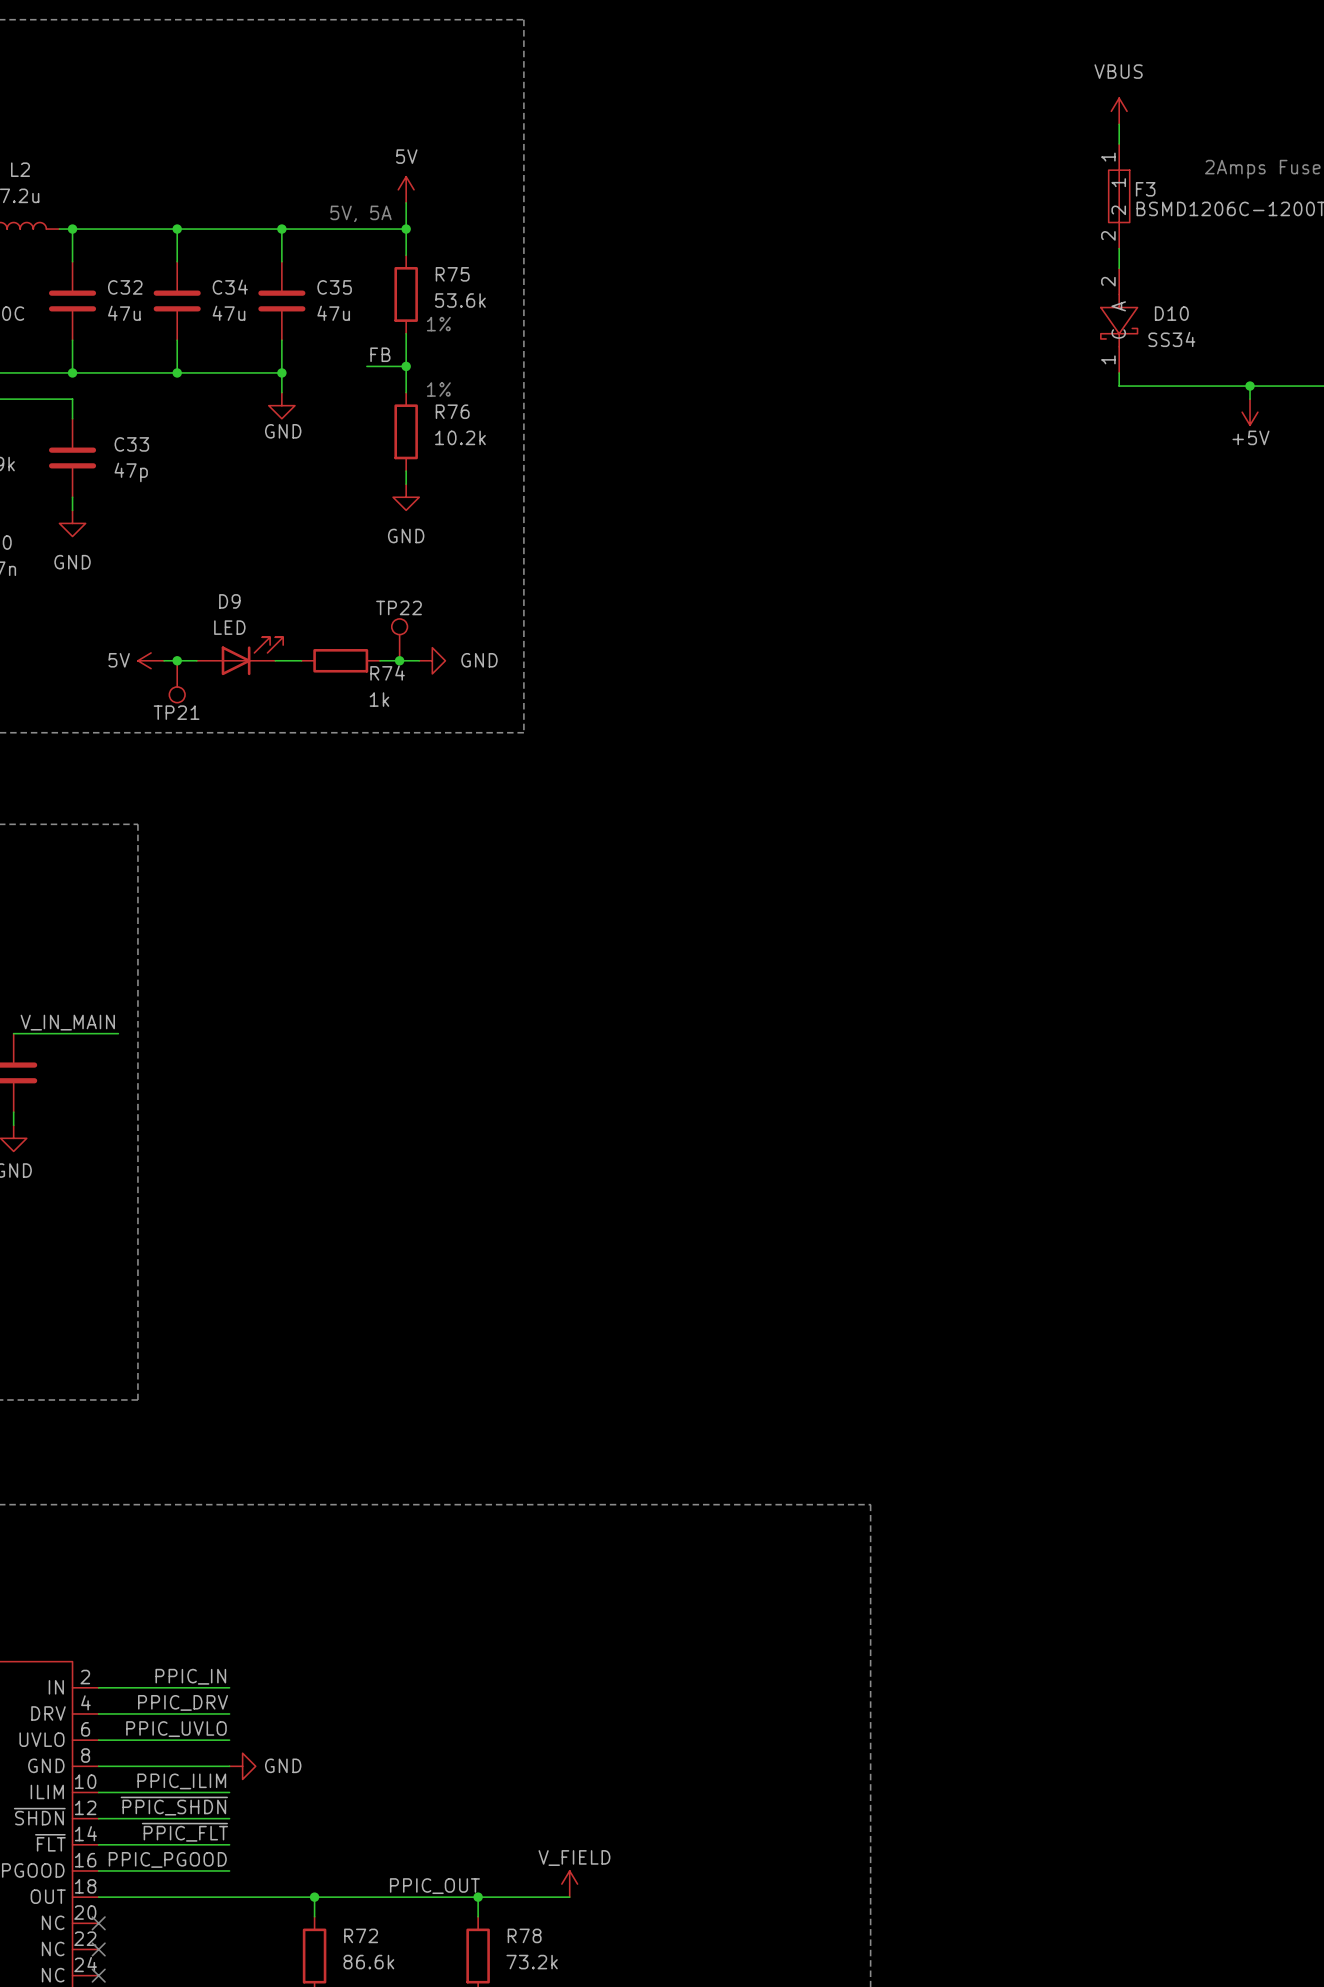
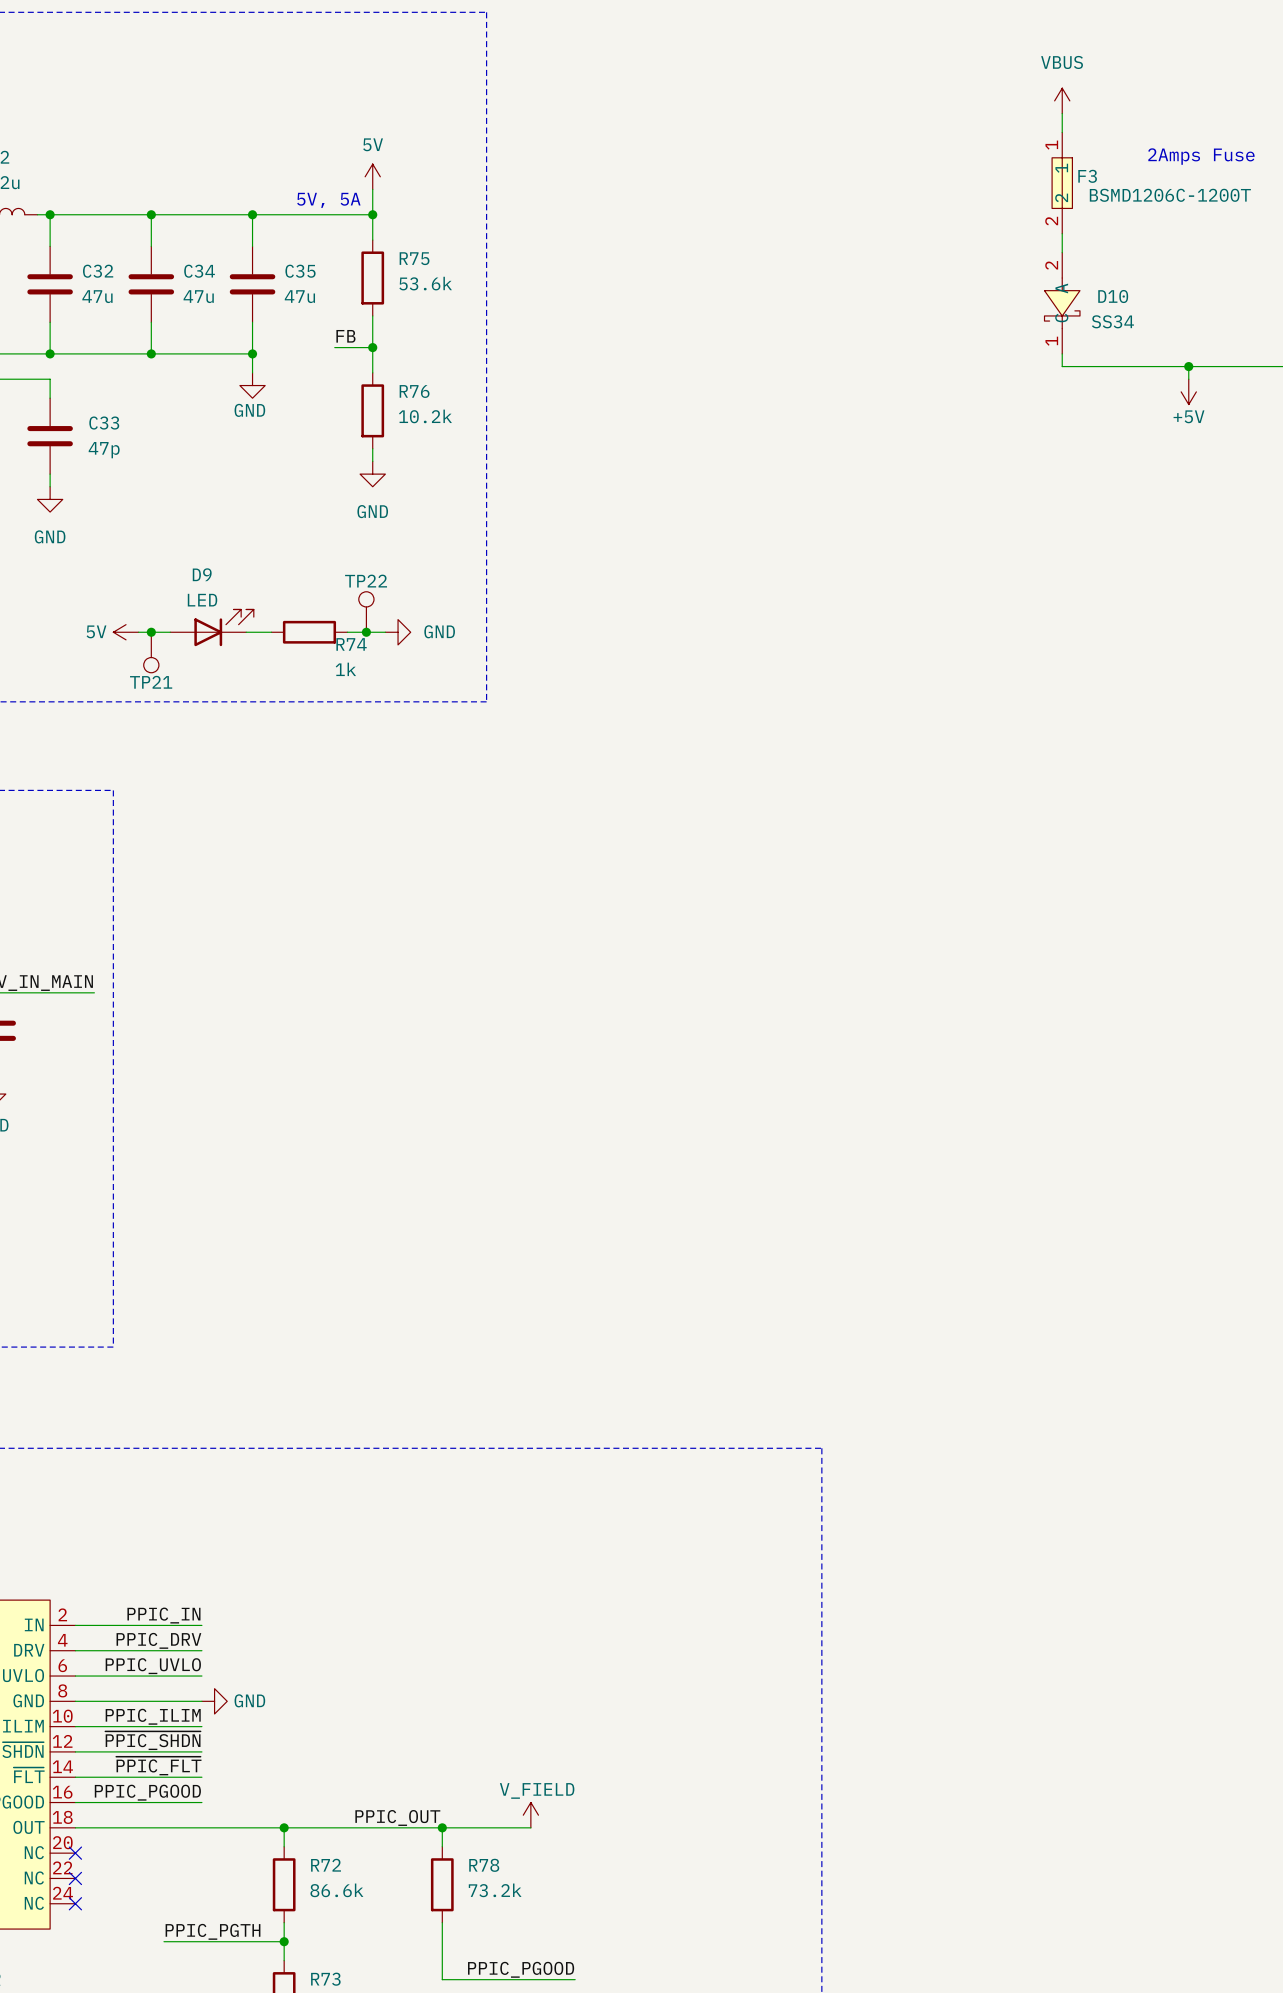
text: 1% (438, 324) -> none
text: 1% (438, 389) -> none

